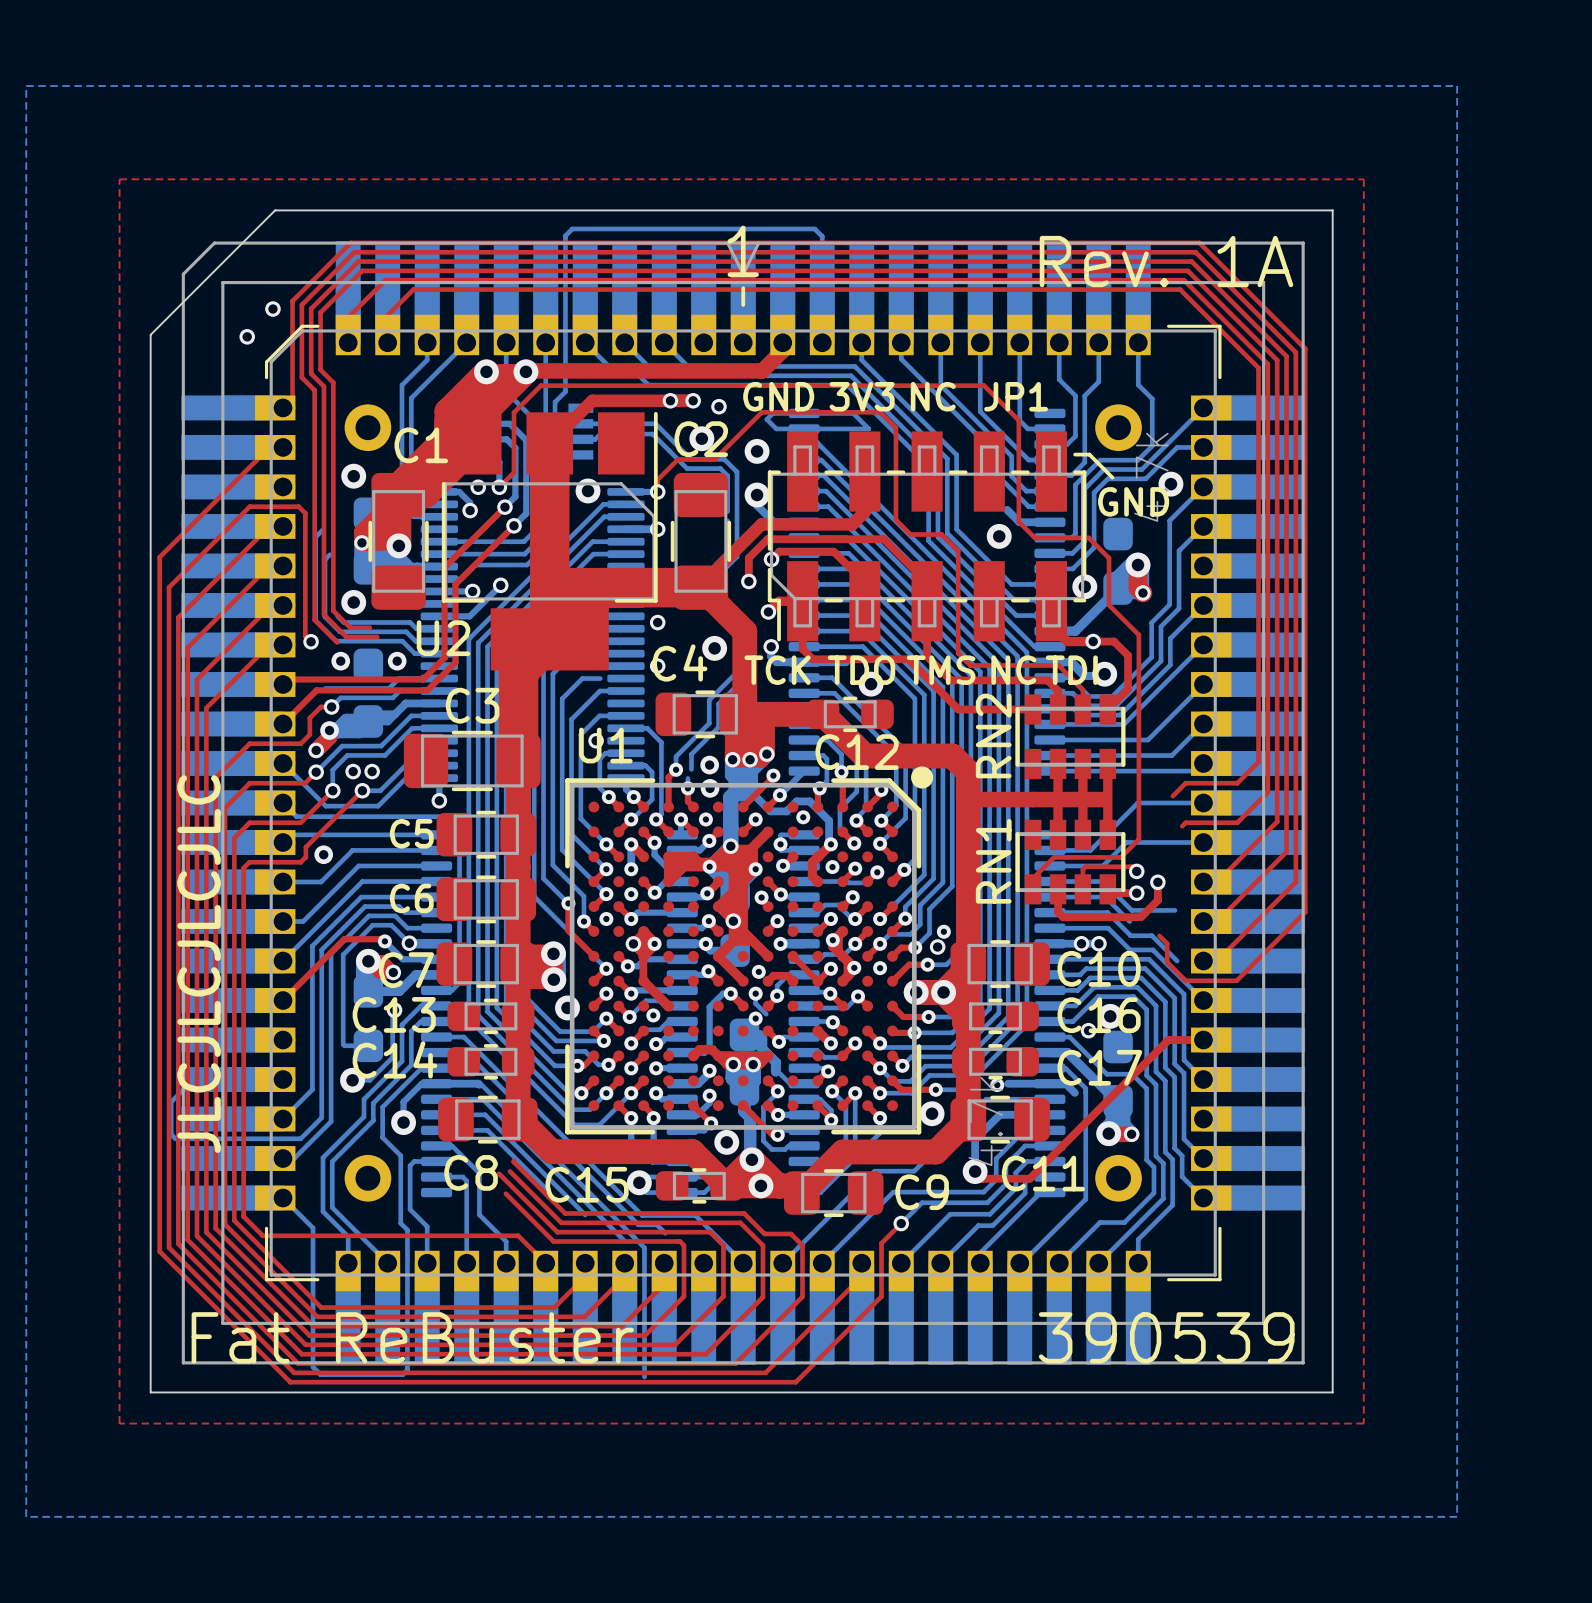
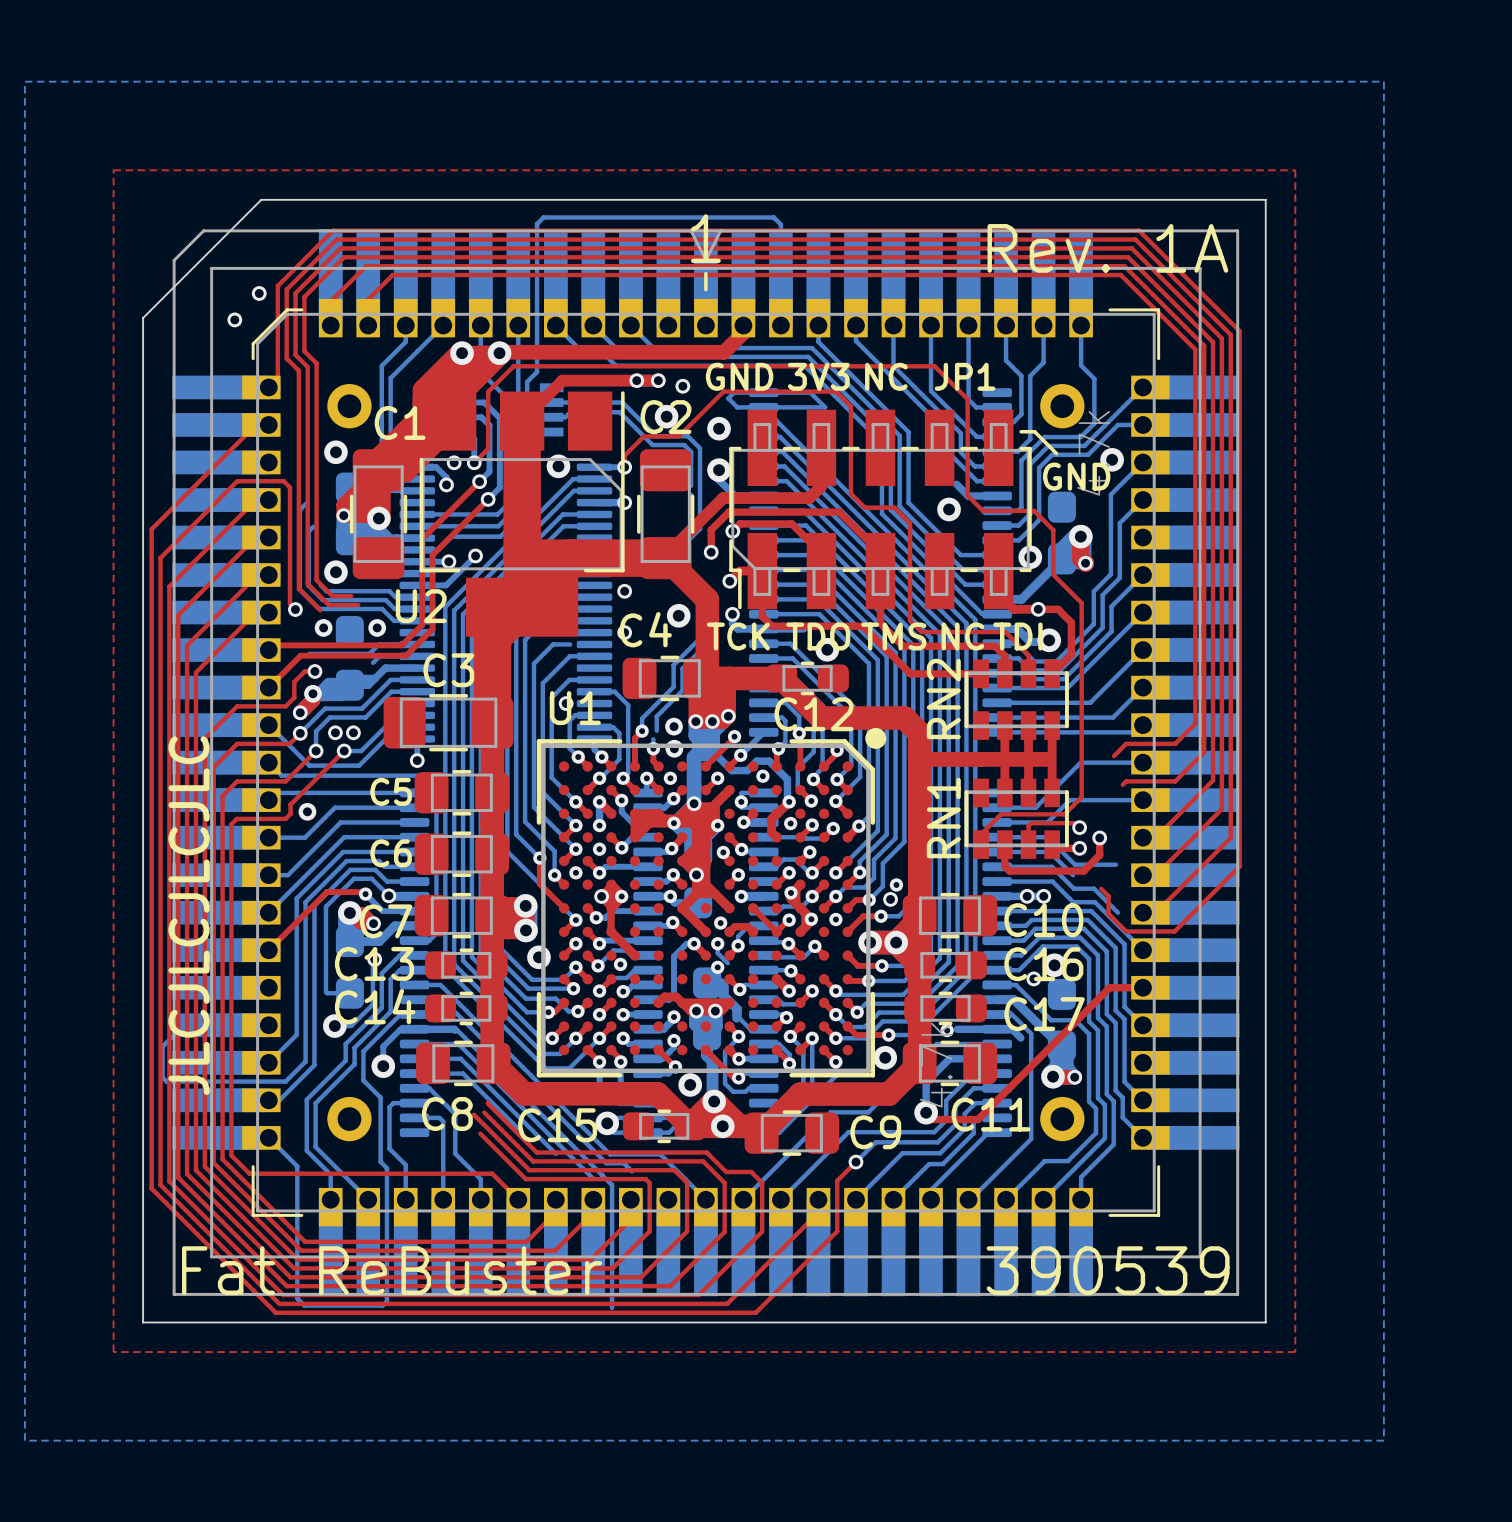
bottom track: (392, 697) (340, 697) (331, 706) -> none

